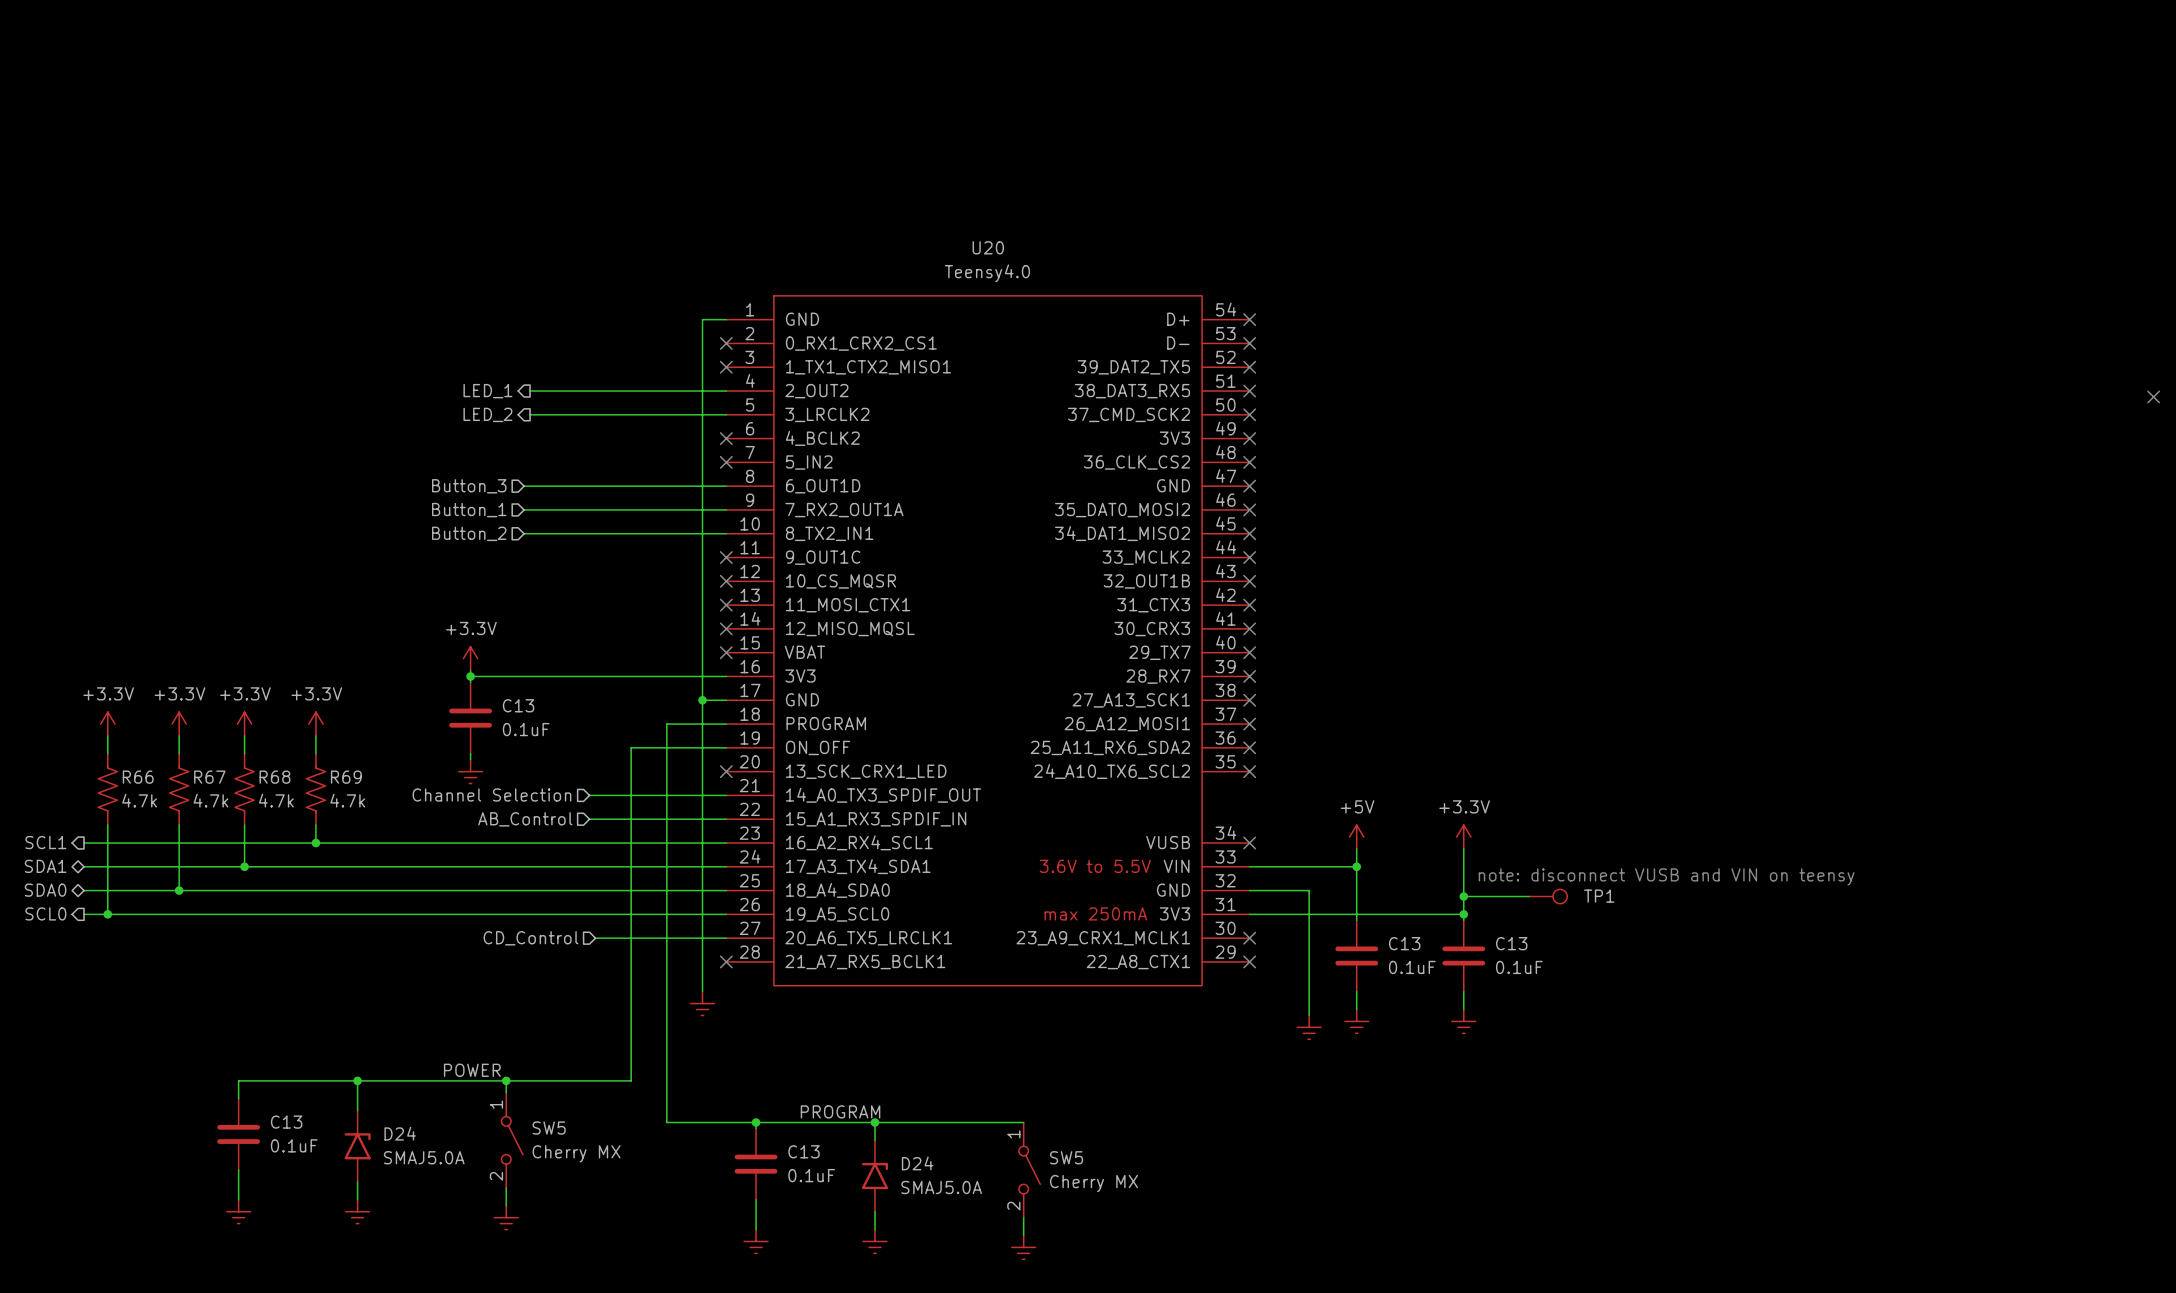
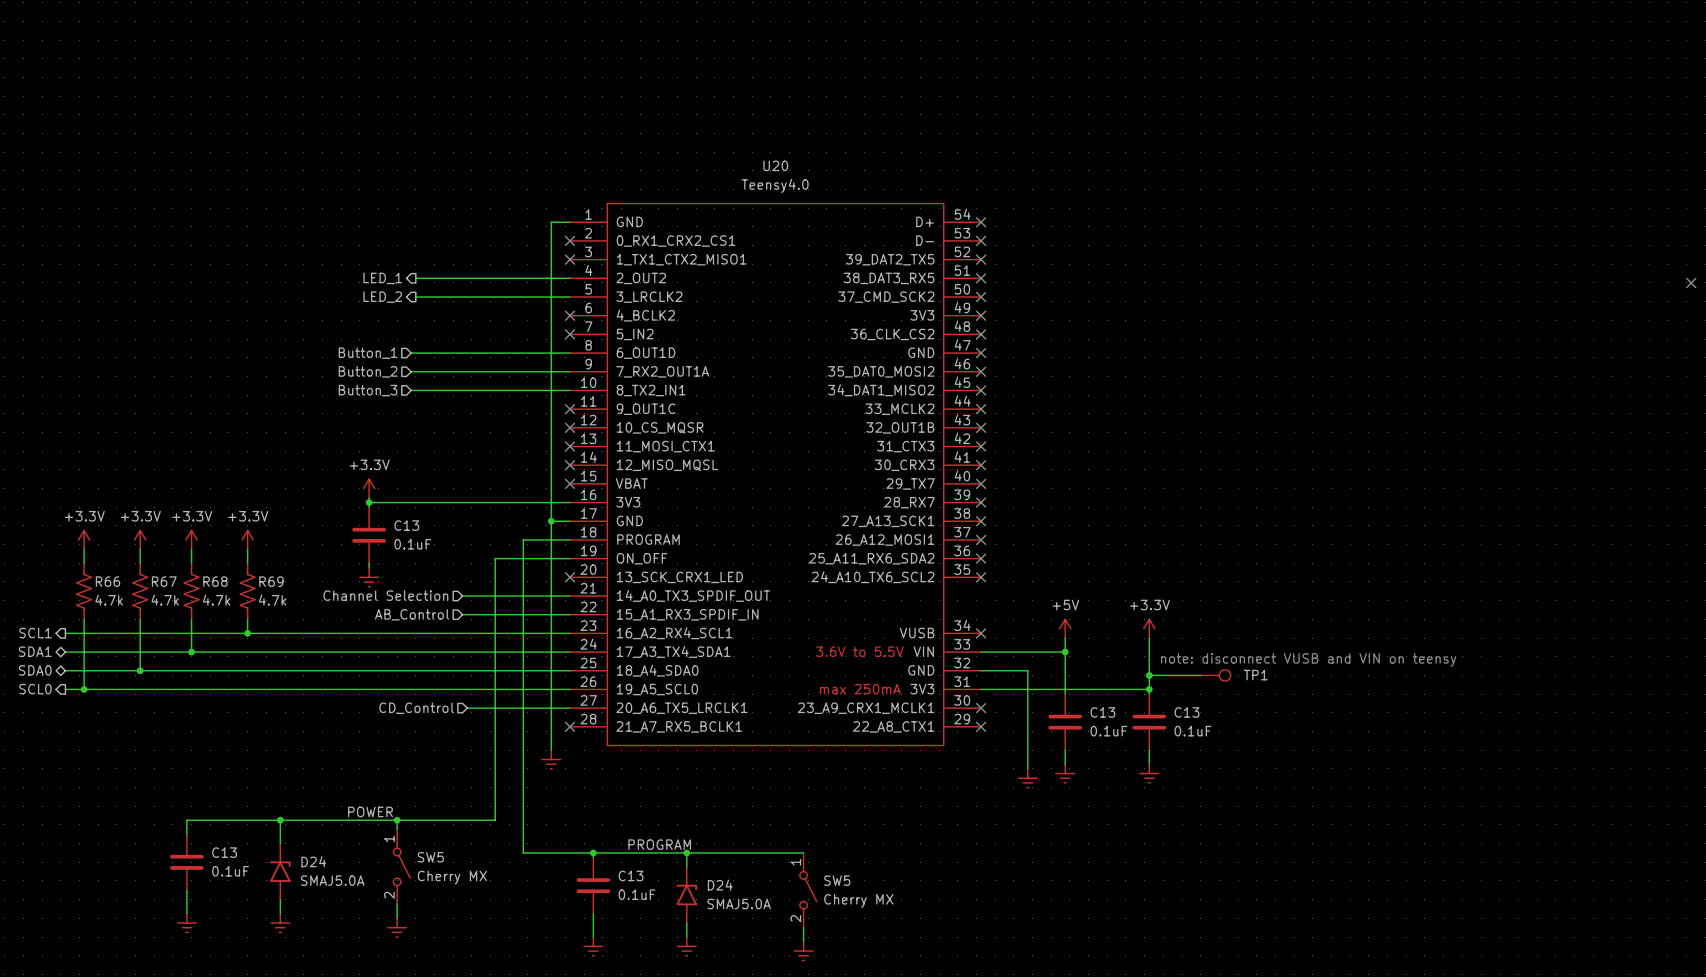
hierarchical label: Button_3 (469, 486) -> Button_1 (368, 353)
hierarchical label: Button_1 (469, 510) -> Button_2 (368, 371)
hierarchical label: Button_2 (469, 533) -> Button_3 (368, 390)

